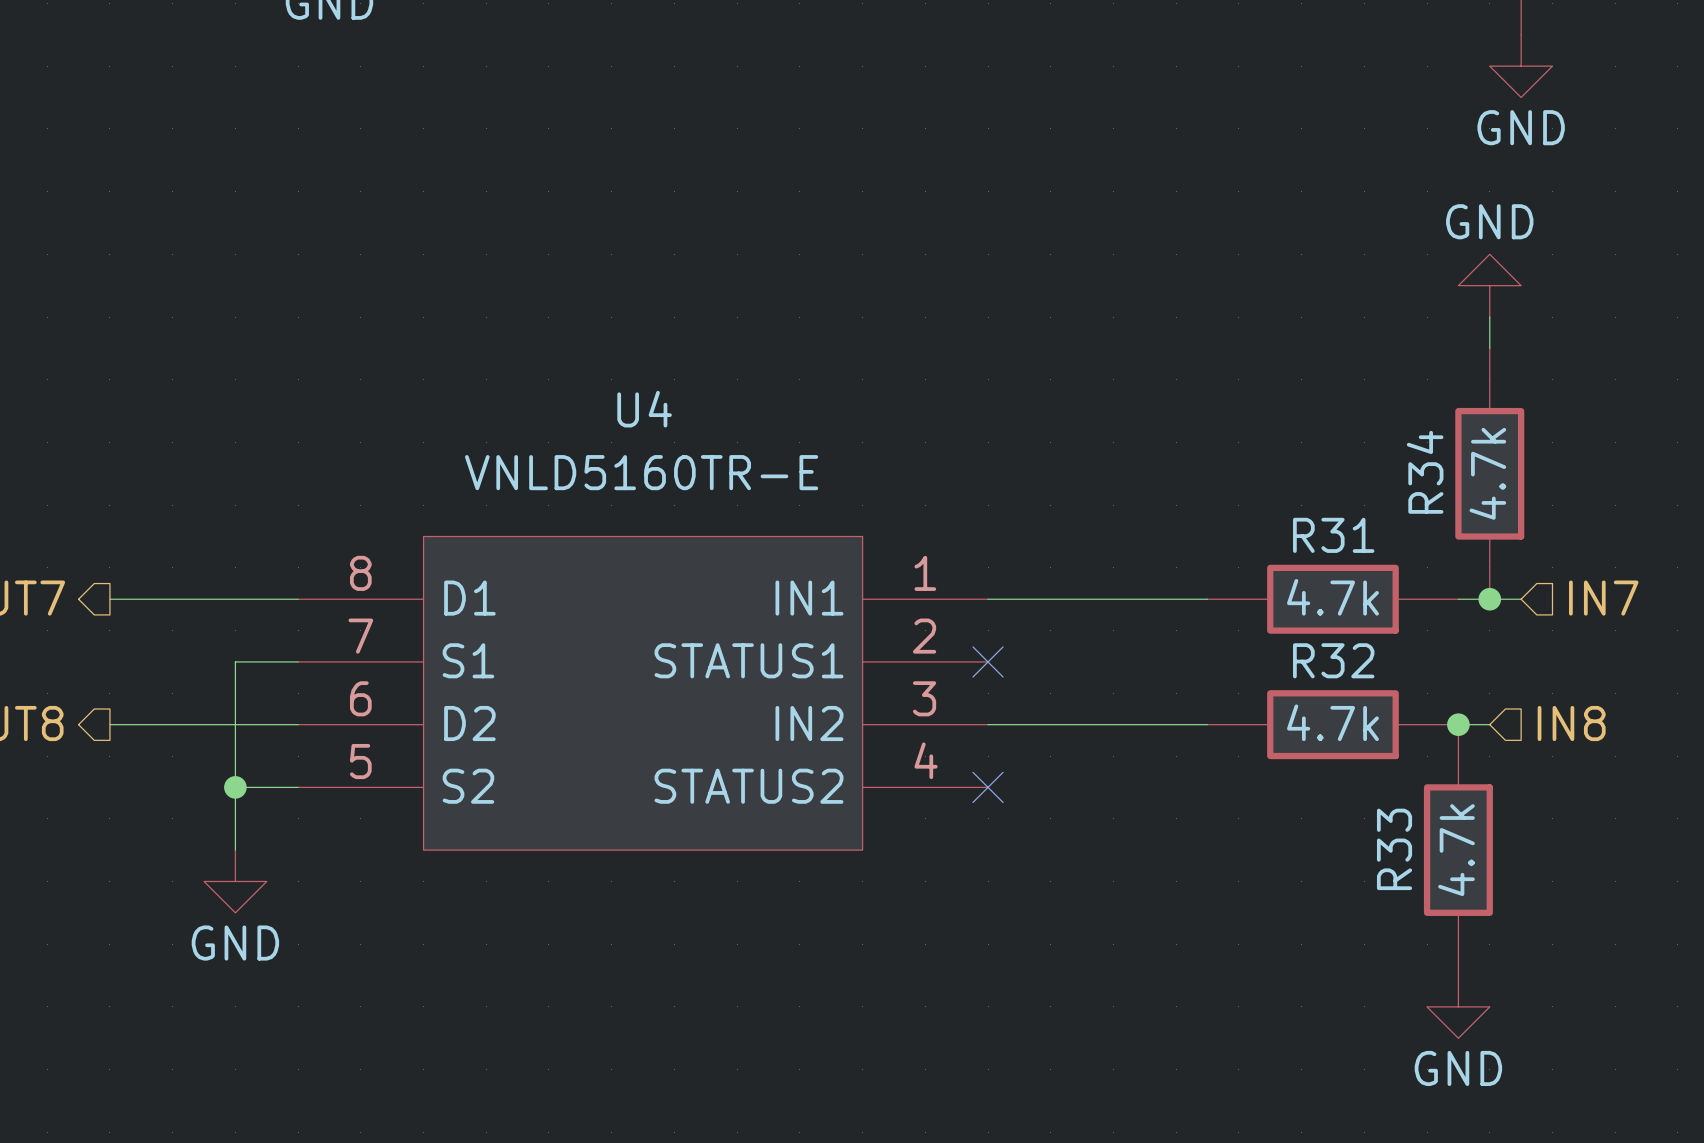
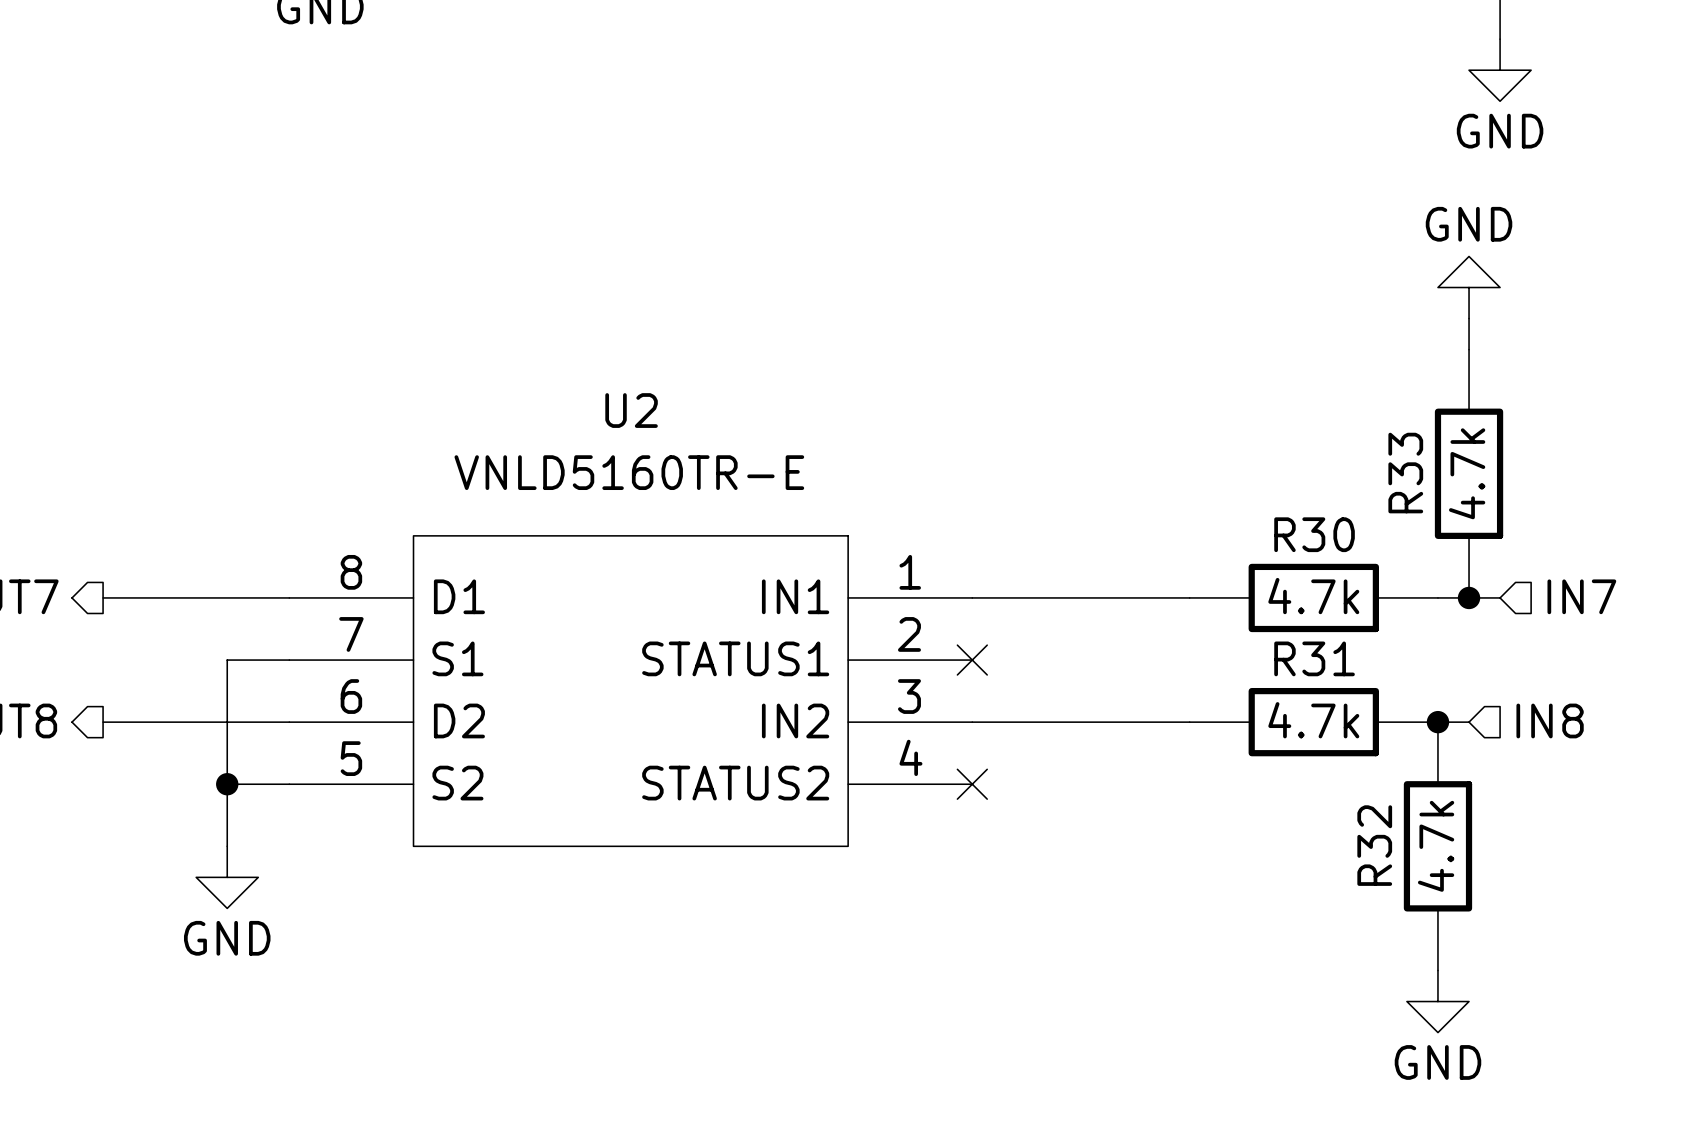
U4 name: U4 (644, 409) -> U2 (631, 410)
R34 name: R34 (1425, 472) -> R33 (1405, 473)
R31 name: R31 (1333, 535) -> R30 (1314, 534)
R32 name: R32 (1333, 660) -> R31 (1314, 658)
R33 name: R33 (1394, 849) -> R32 (1374, 845)

